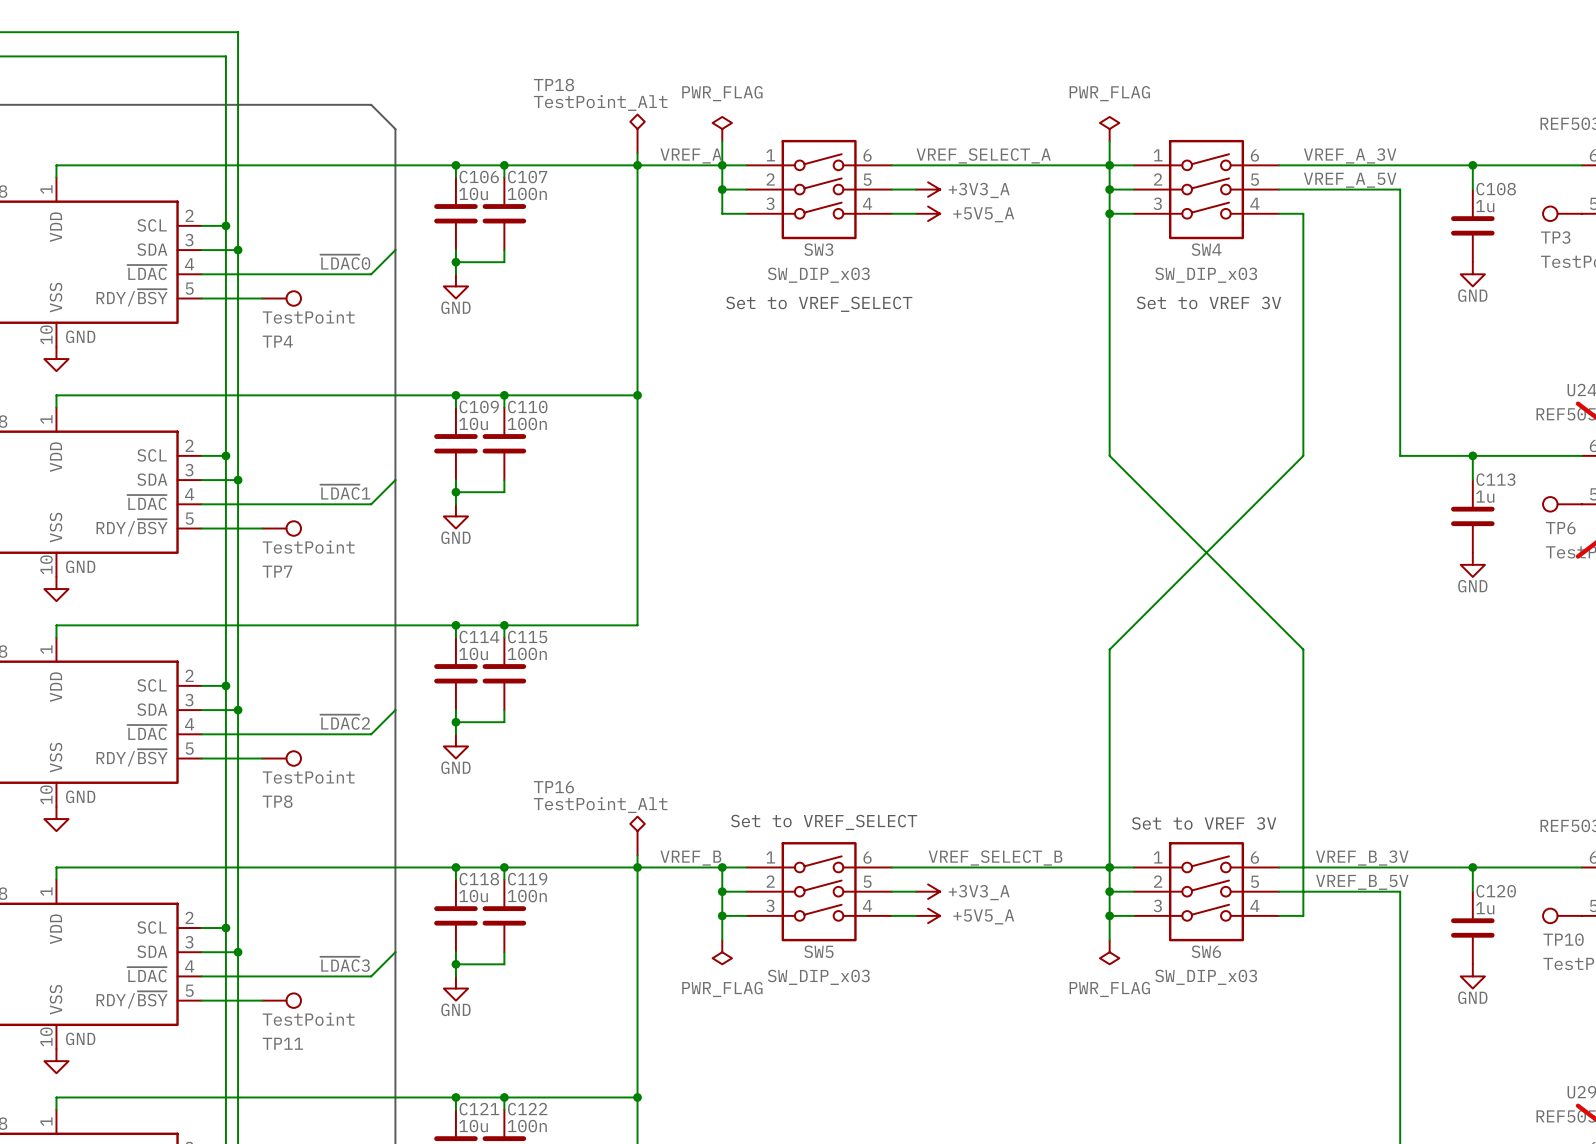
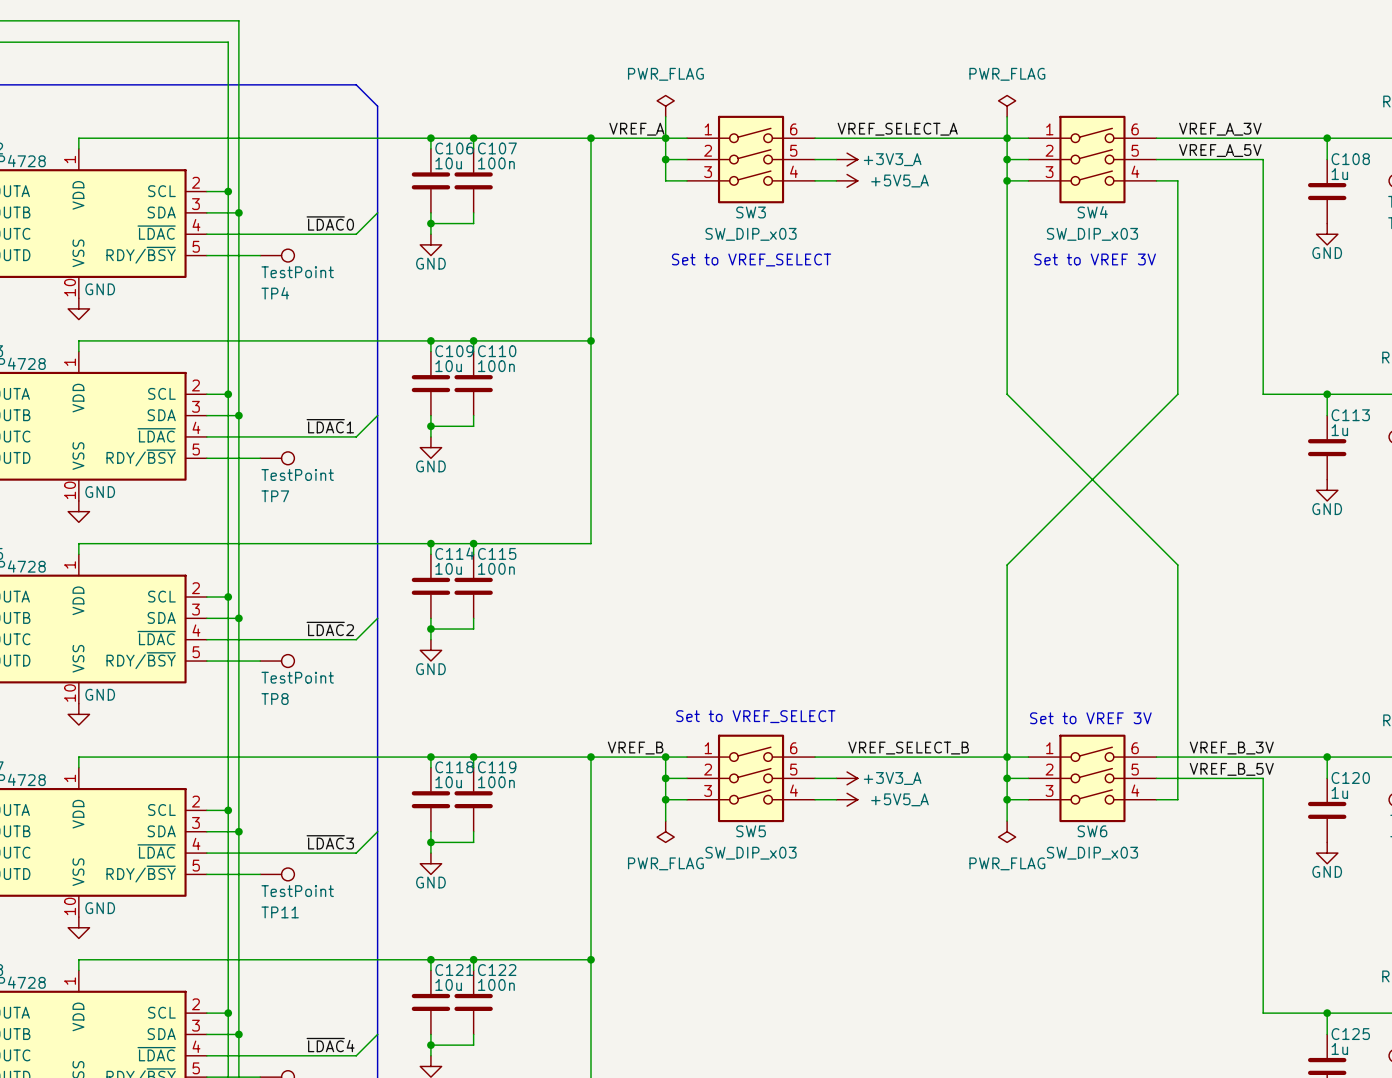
TP18: TestPoint_Alt (637, 133) -> none
wire: (637, 153) (637, 165) -> none
TP16: TestPoint_Alt (637, 836) -> none
wire: (637, 855) (637, 867) -> none

